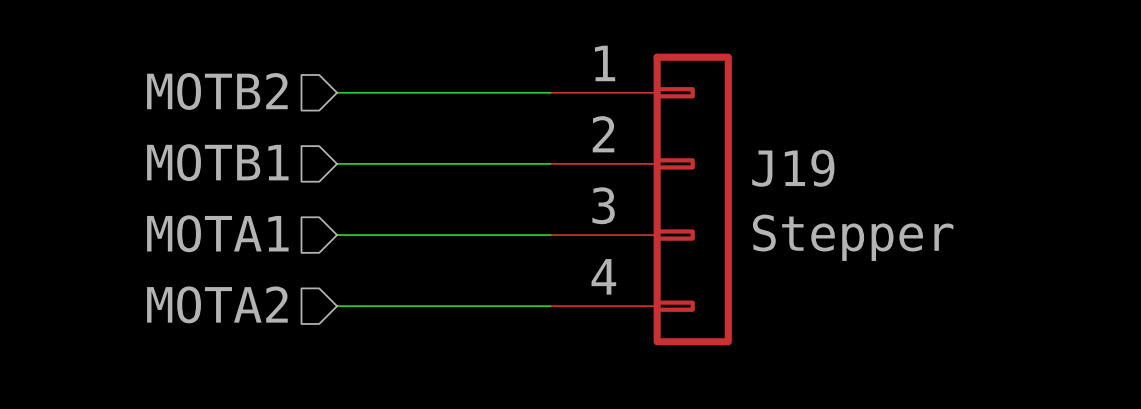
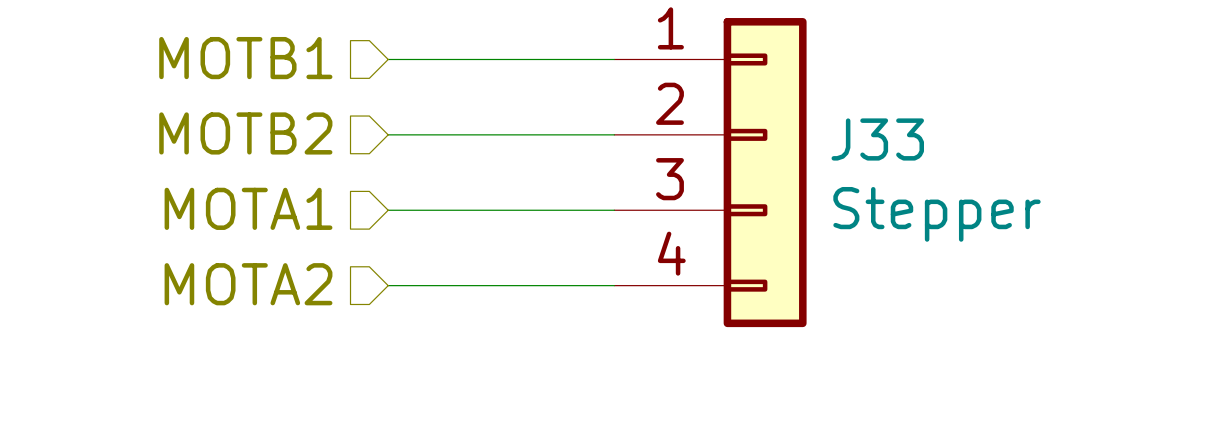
hierarchical label: MOTB2 (217, 91) -> MOTB1 (245, 58)
hierarchical label: MOTB1 (217, 162) -> MOTB2 (245, 133)
J19 name: J19 (793, 168) -> J33 (877, 139)

